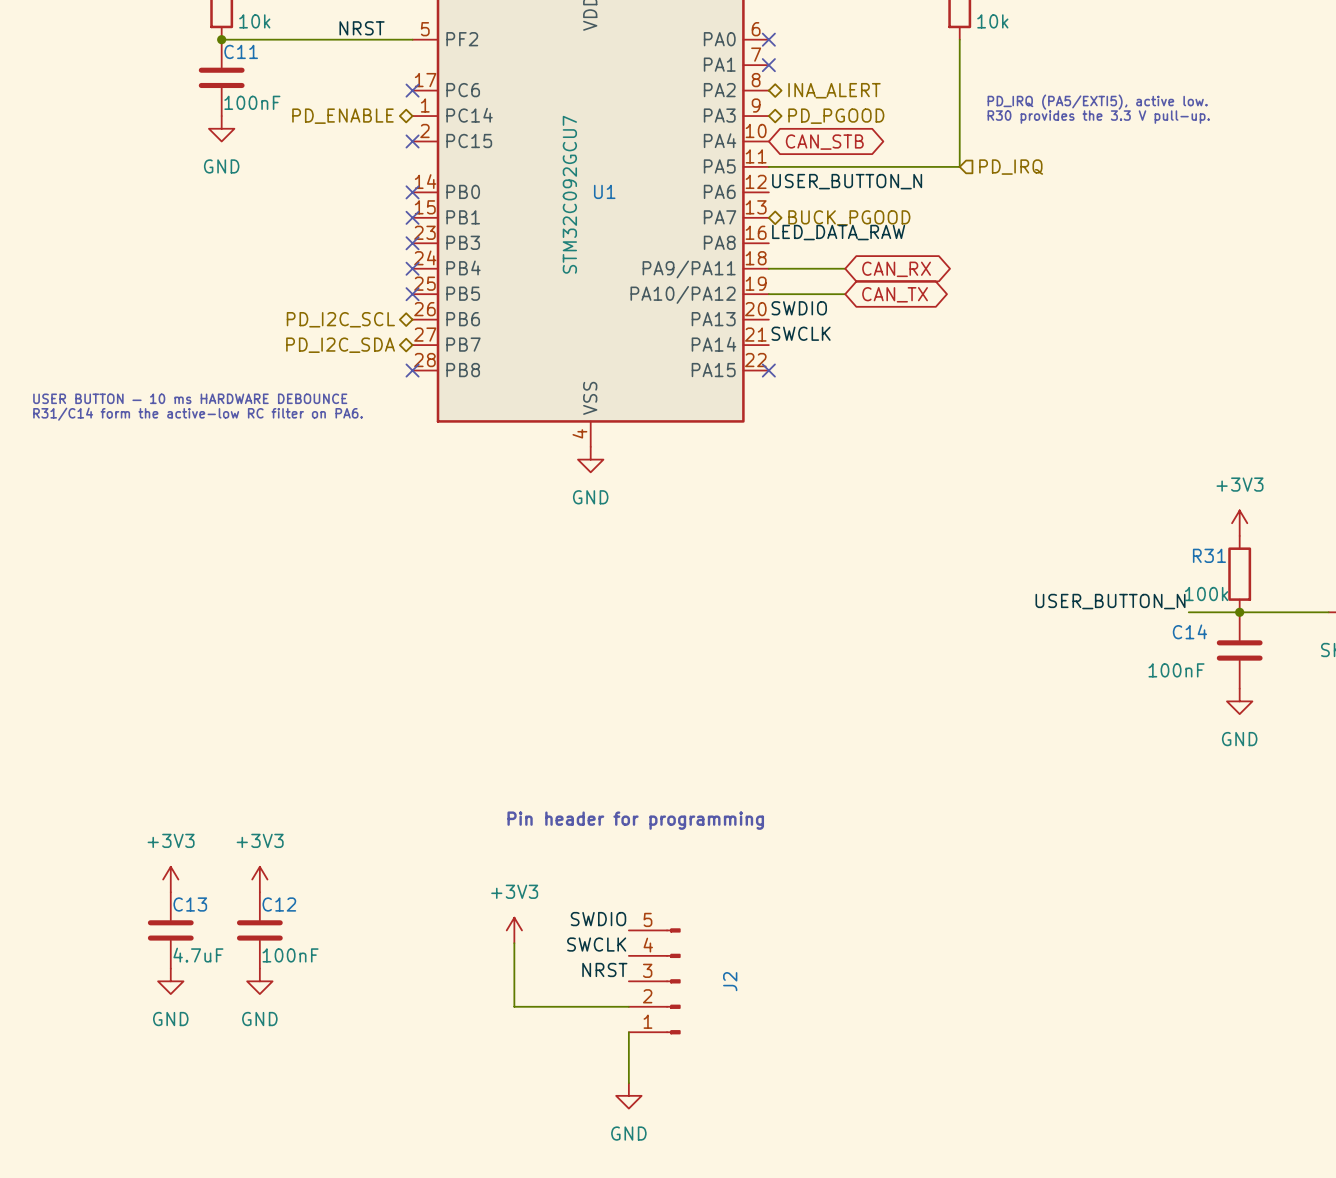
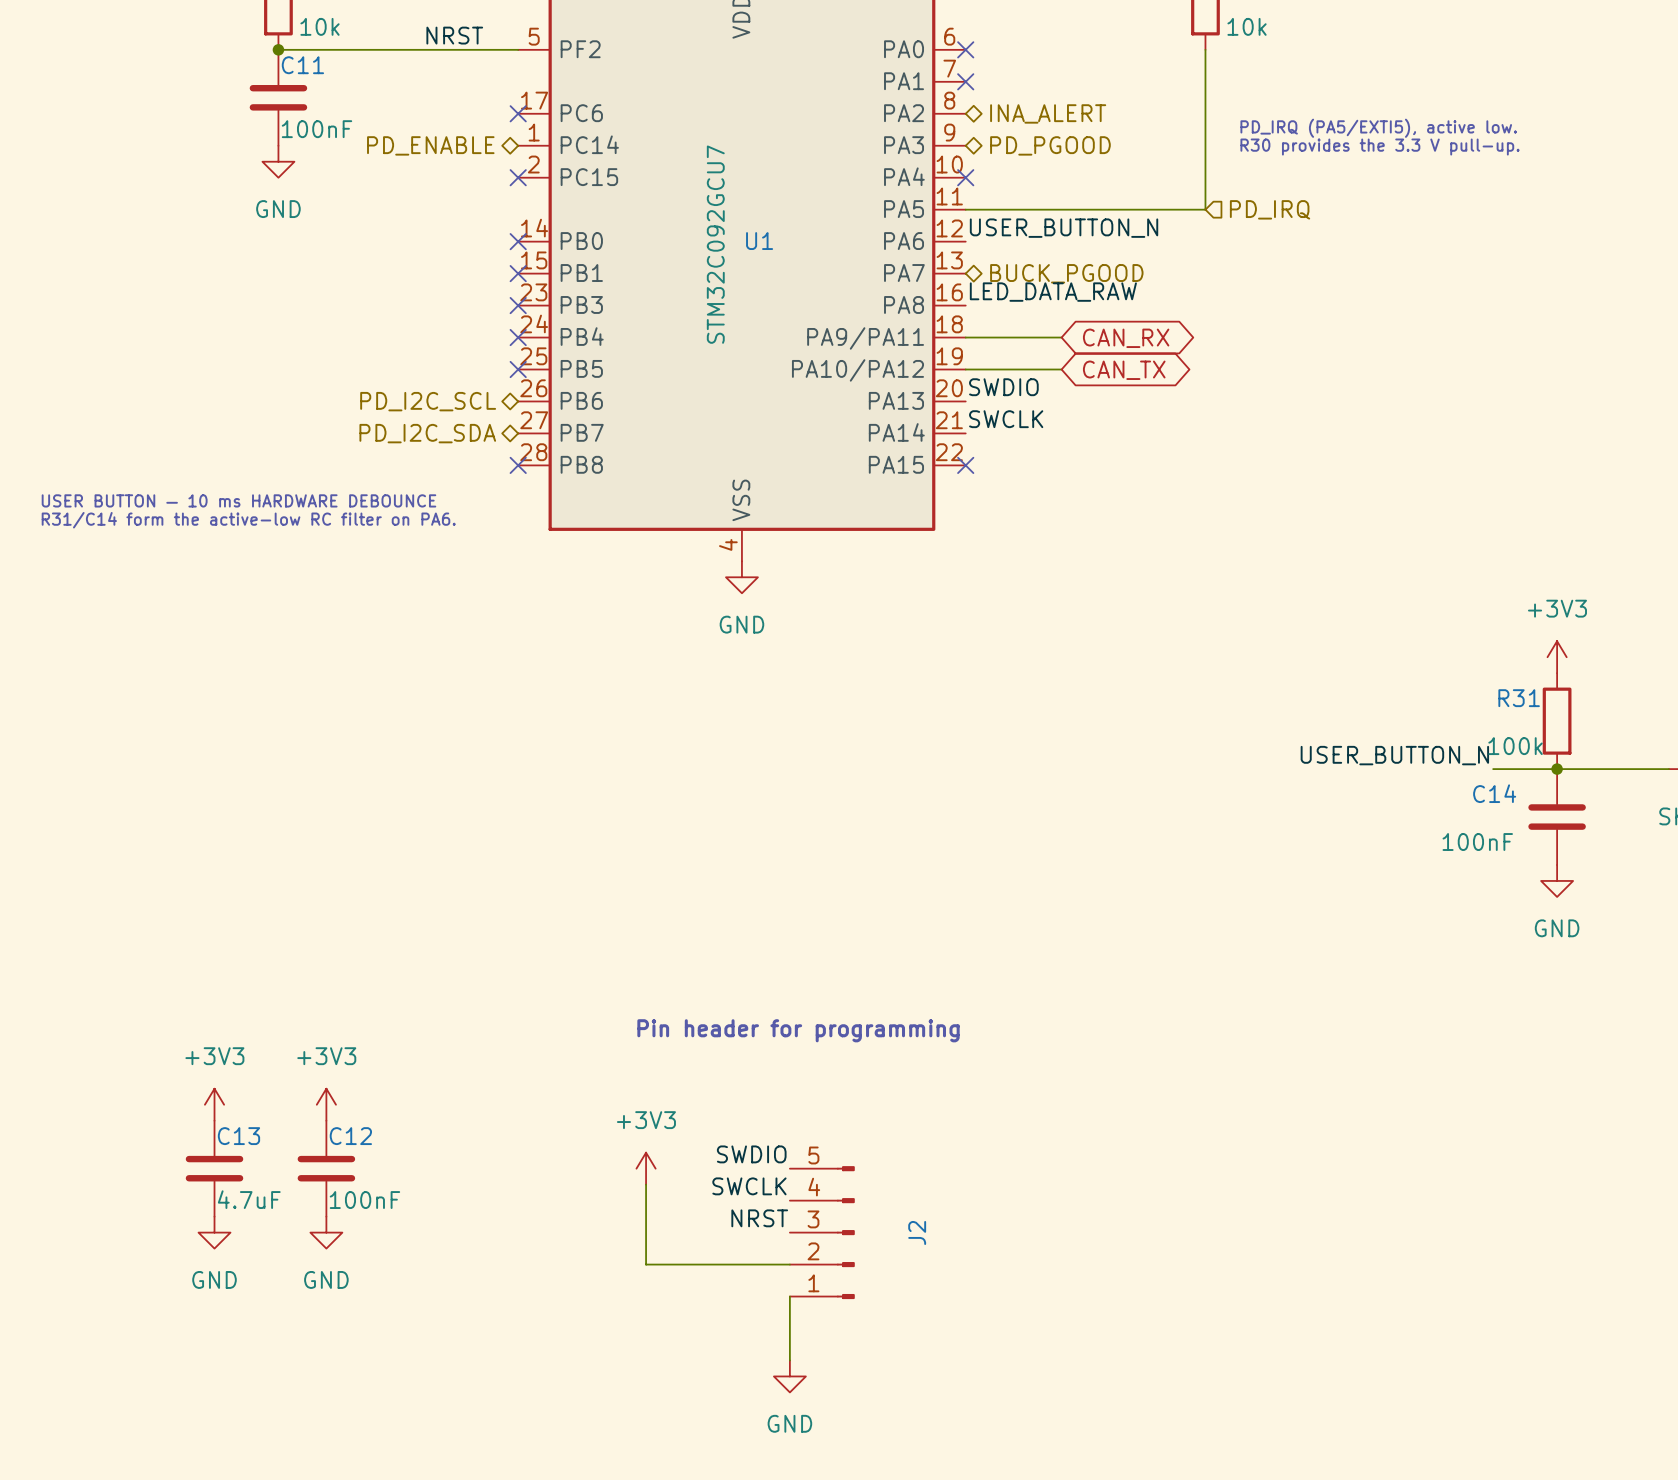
no-connect mark: none -> (965, 177)
global label: CAN_STB (824, 142) -> none

